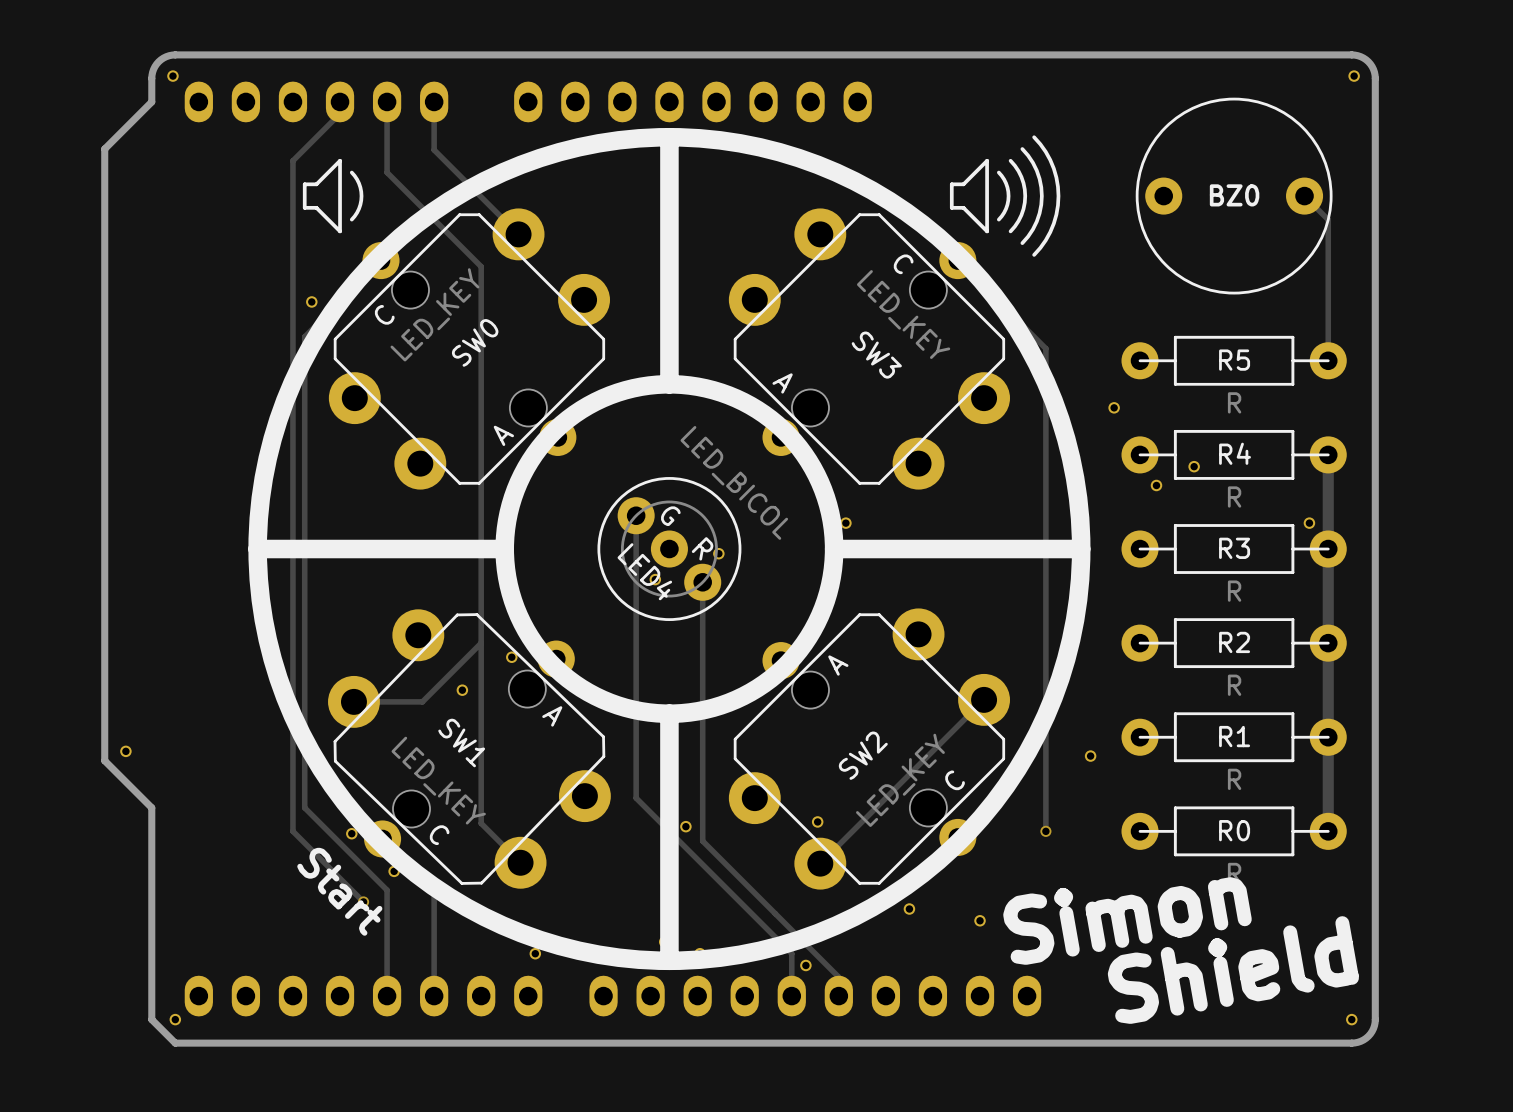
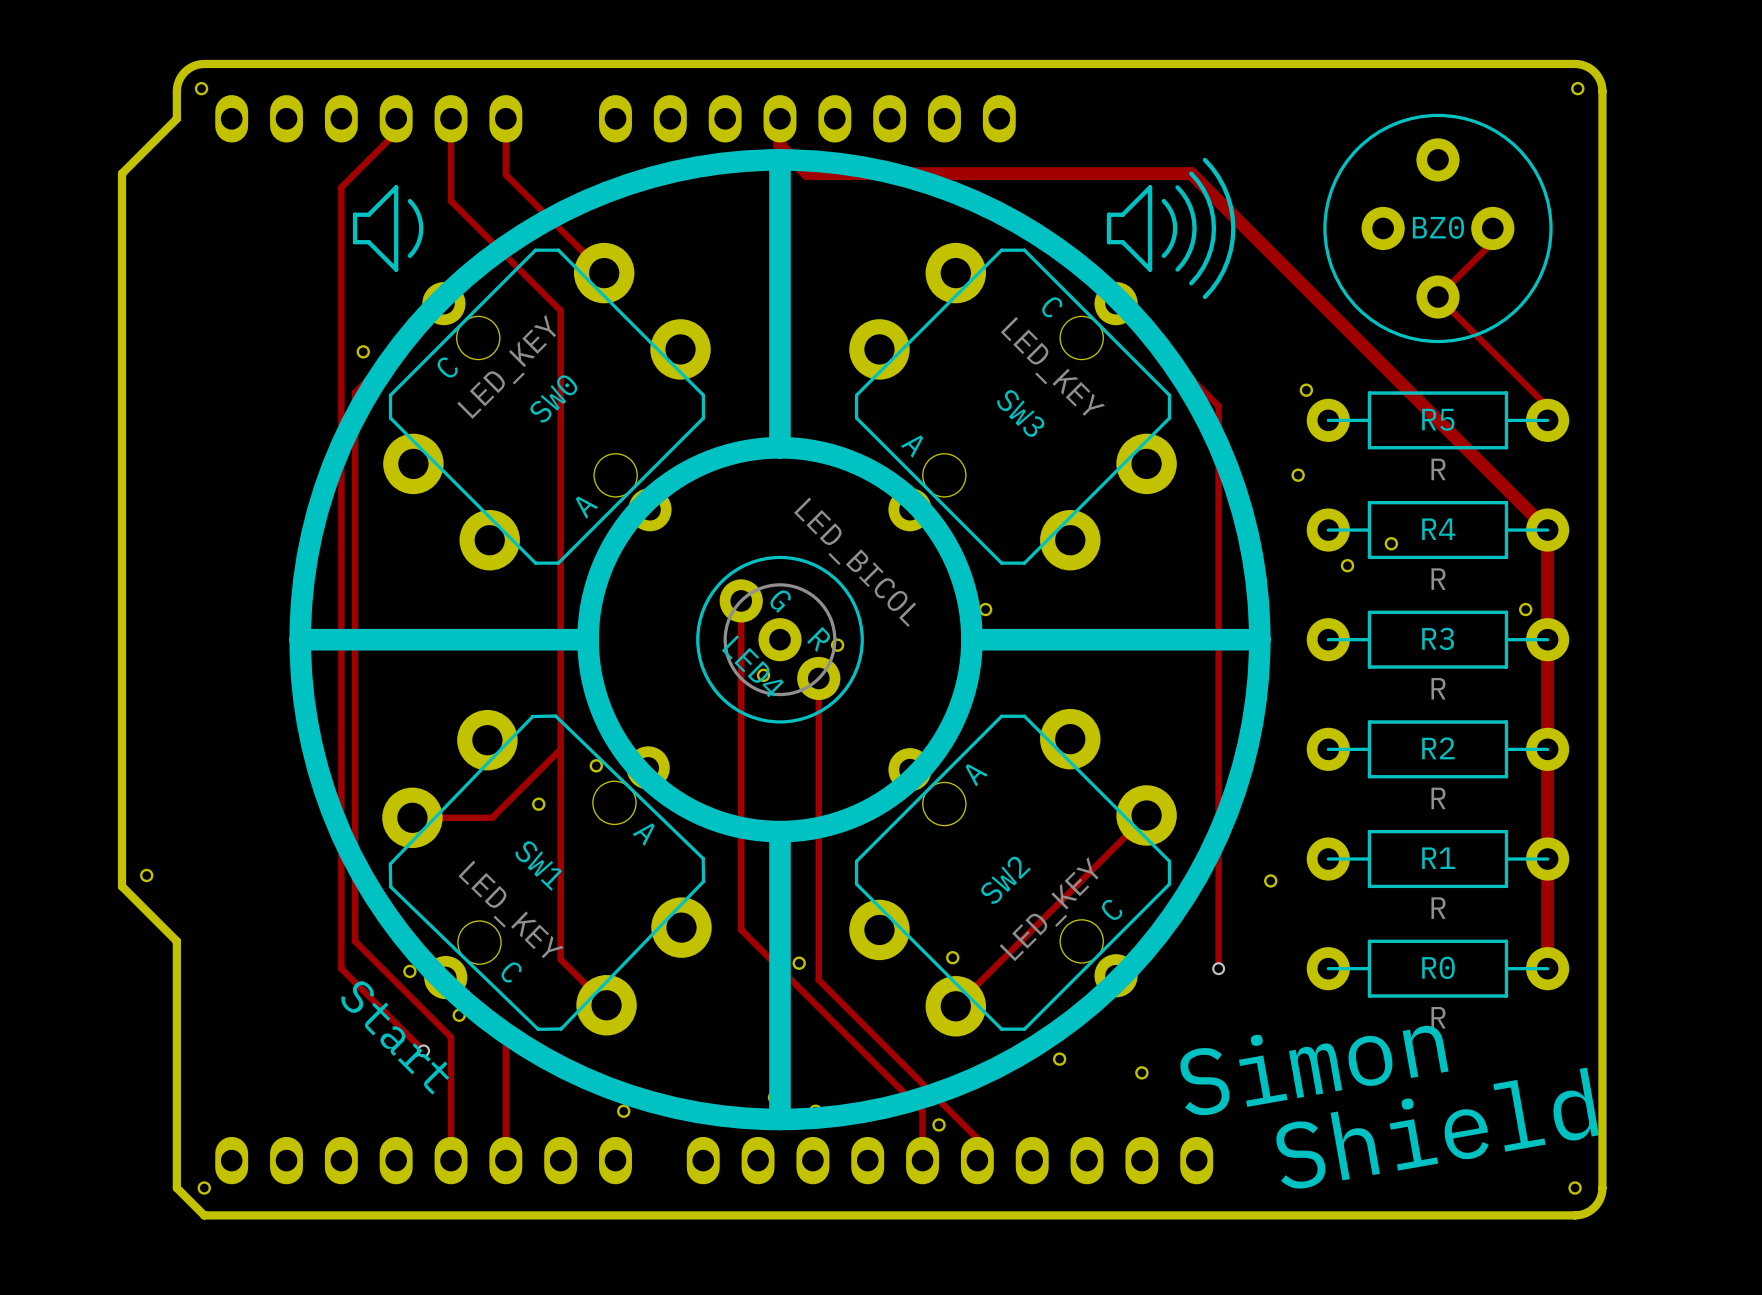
BZ0 footprint: [1135, 97, 1333, 295] -> [1323, 113, 1553, 344]
track: none -> (780, 118) (780, 146) (807, 173) (1191, 173) (1547, 530)
track: (1304, 196) (1328, 219) (1328, 349) -> (1492, 228) (1492, 242) (1437, 297) (1547, 406)
part: none -> (1306, 390)

